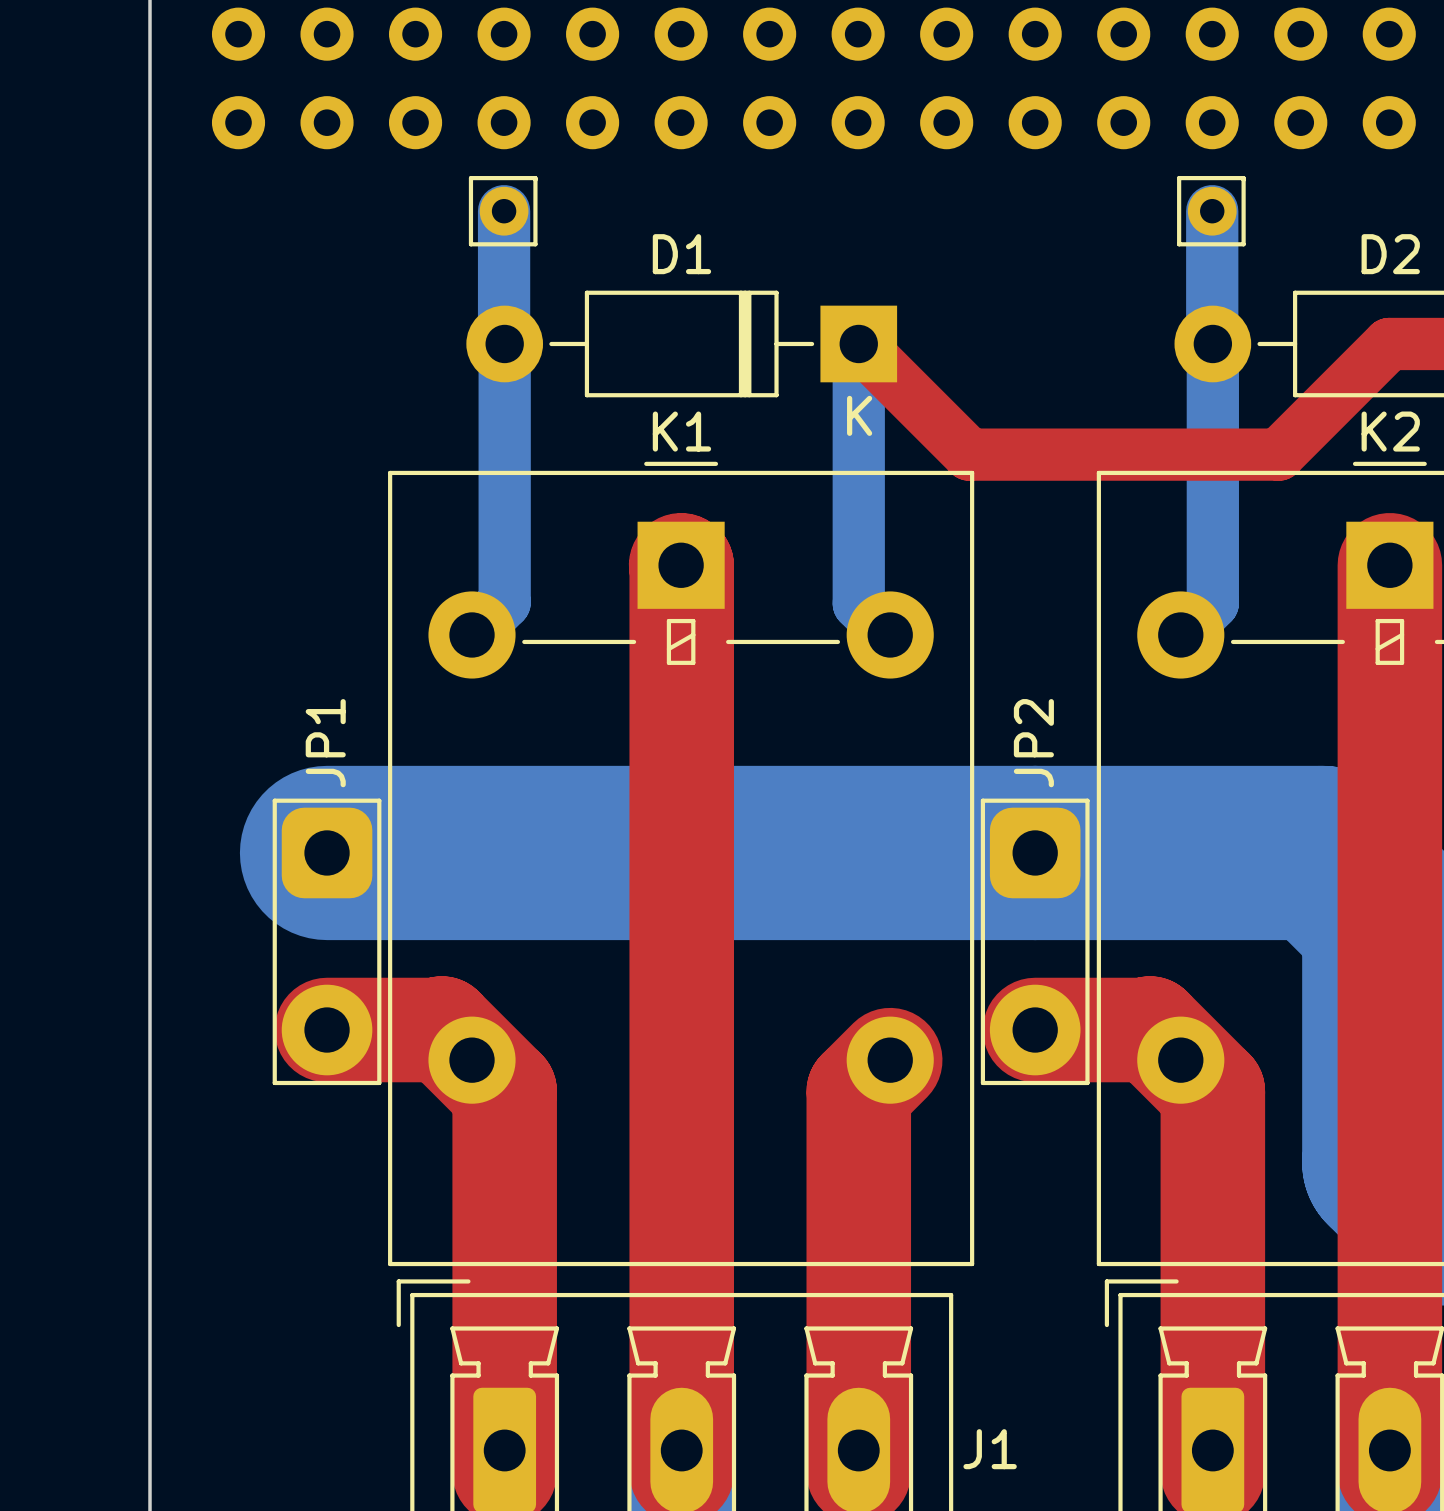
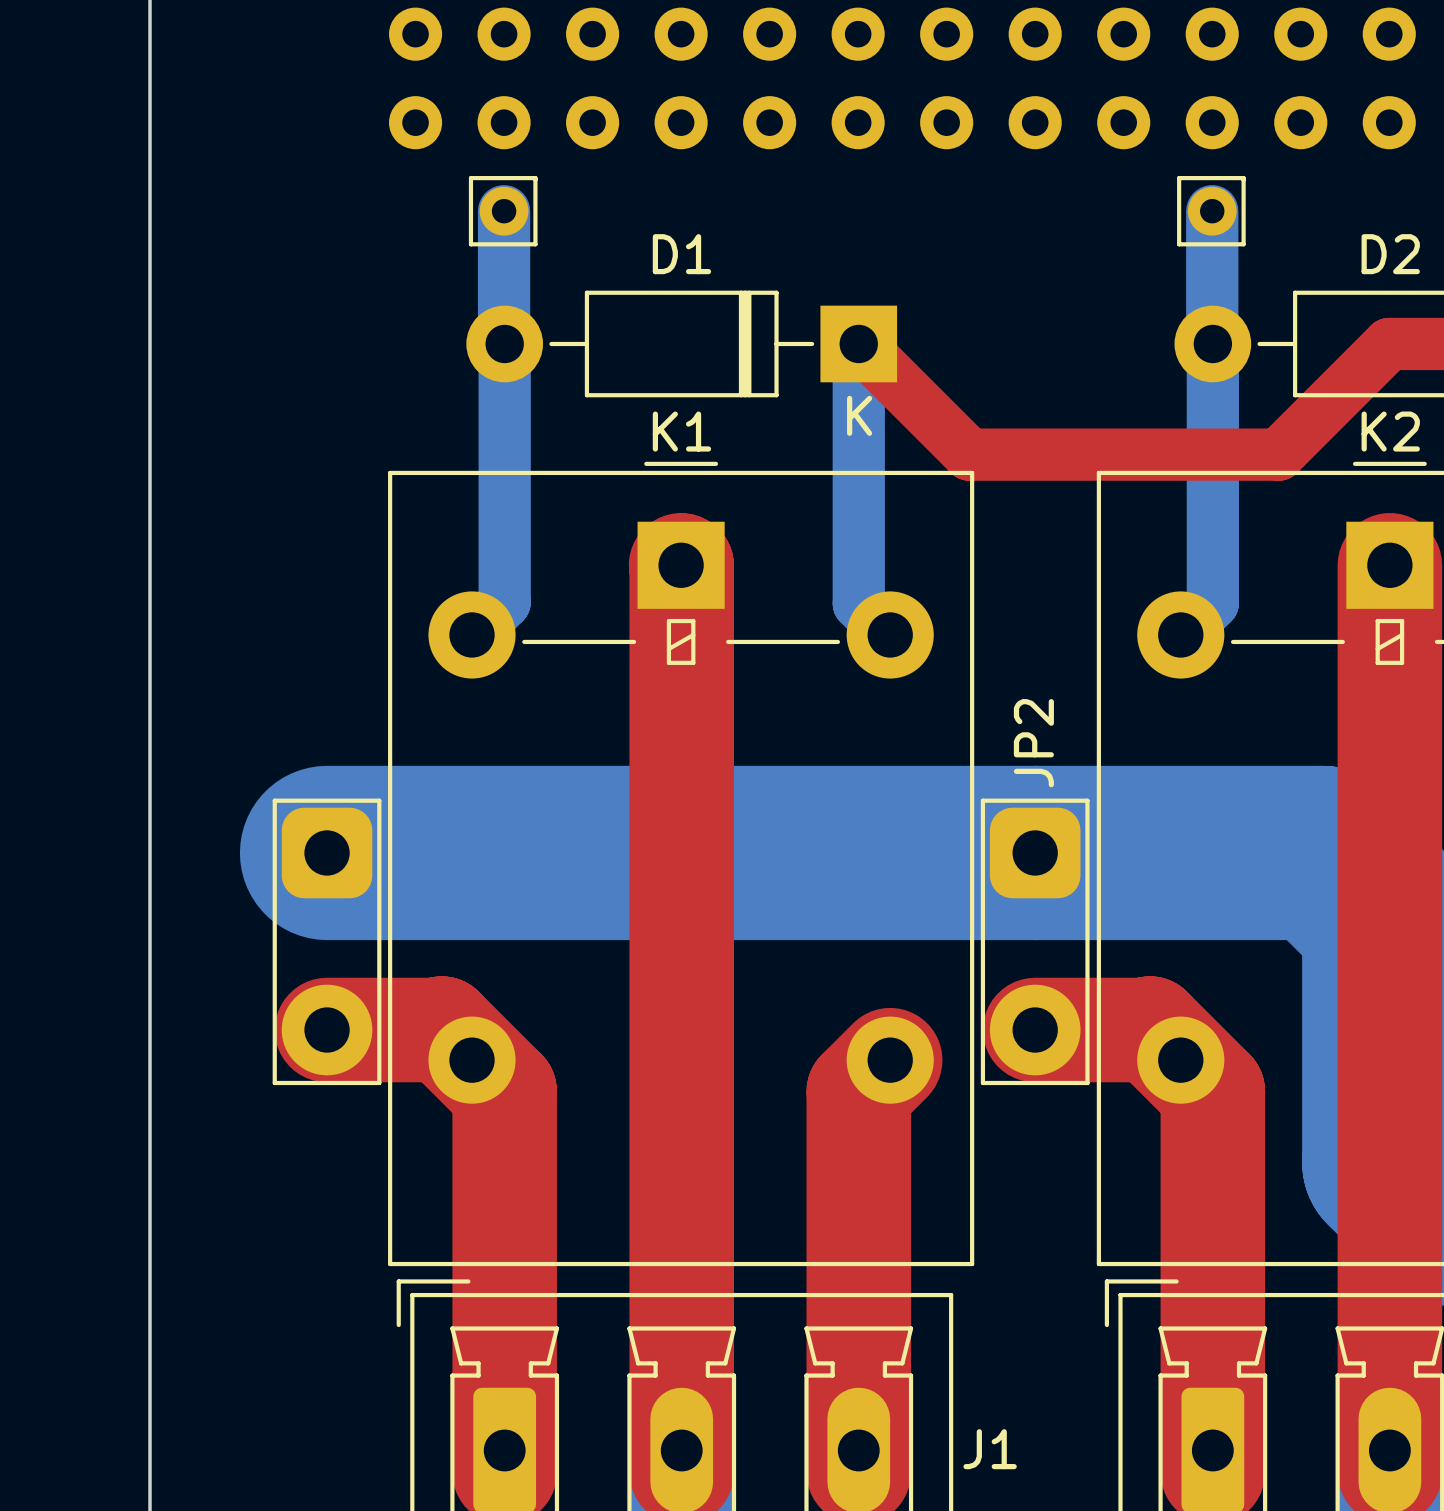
part: (238, 34) -> none
part: (327, 34) -> none
part: (238, 122) -> none
part: (327, 122) -> none
JP1 name: JP1 (325, 743) -> none

